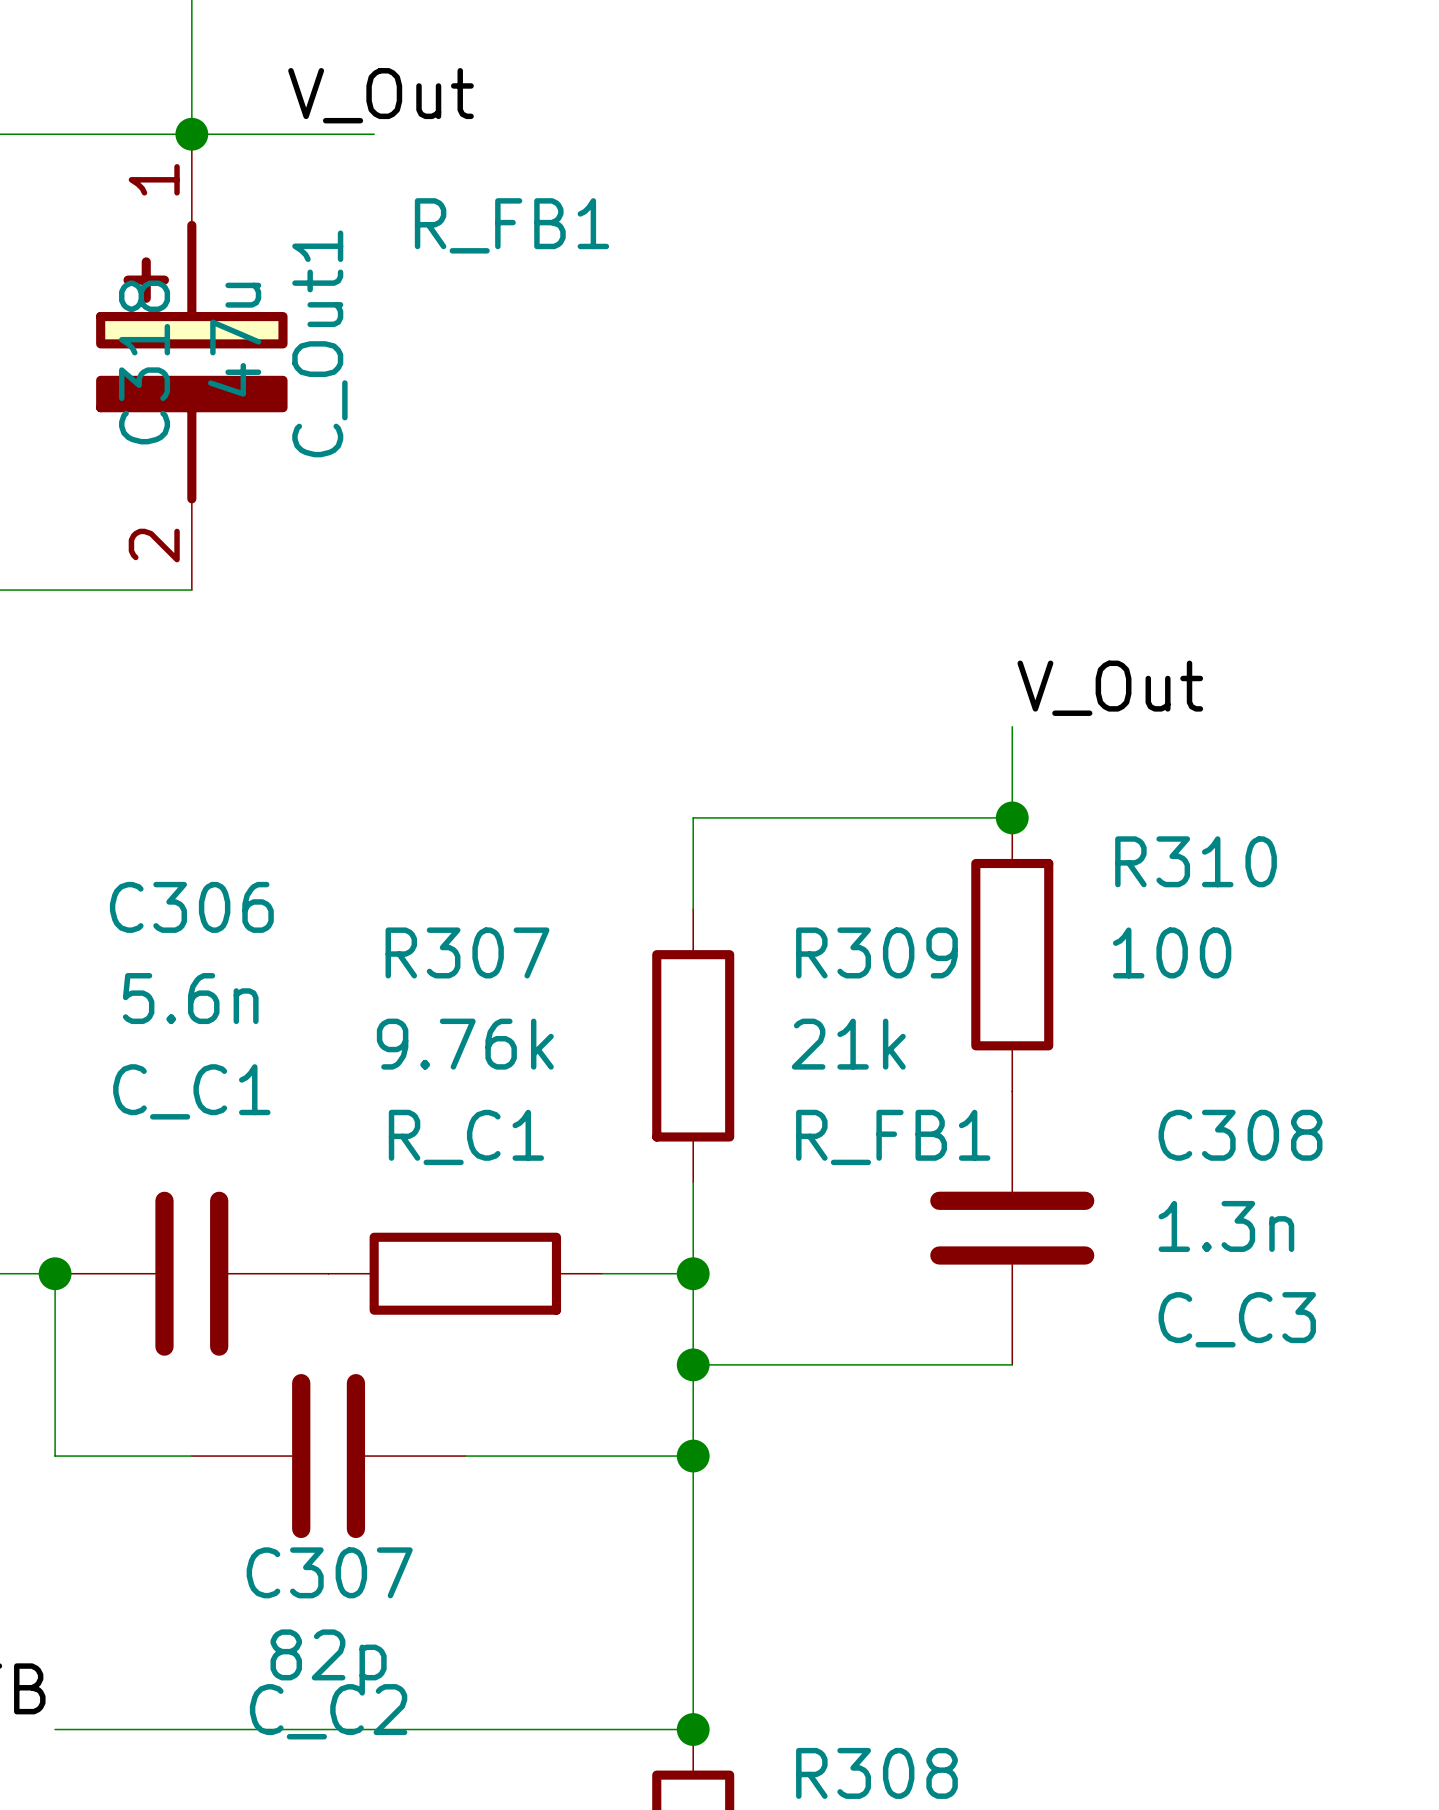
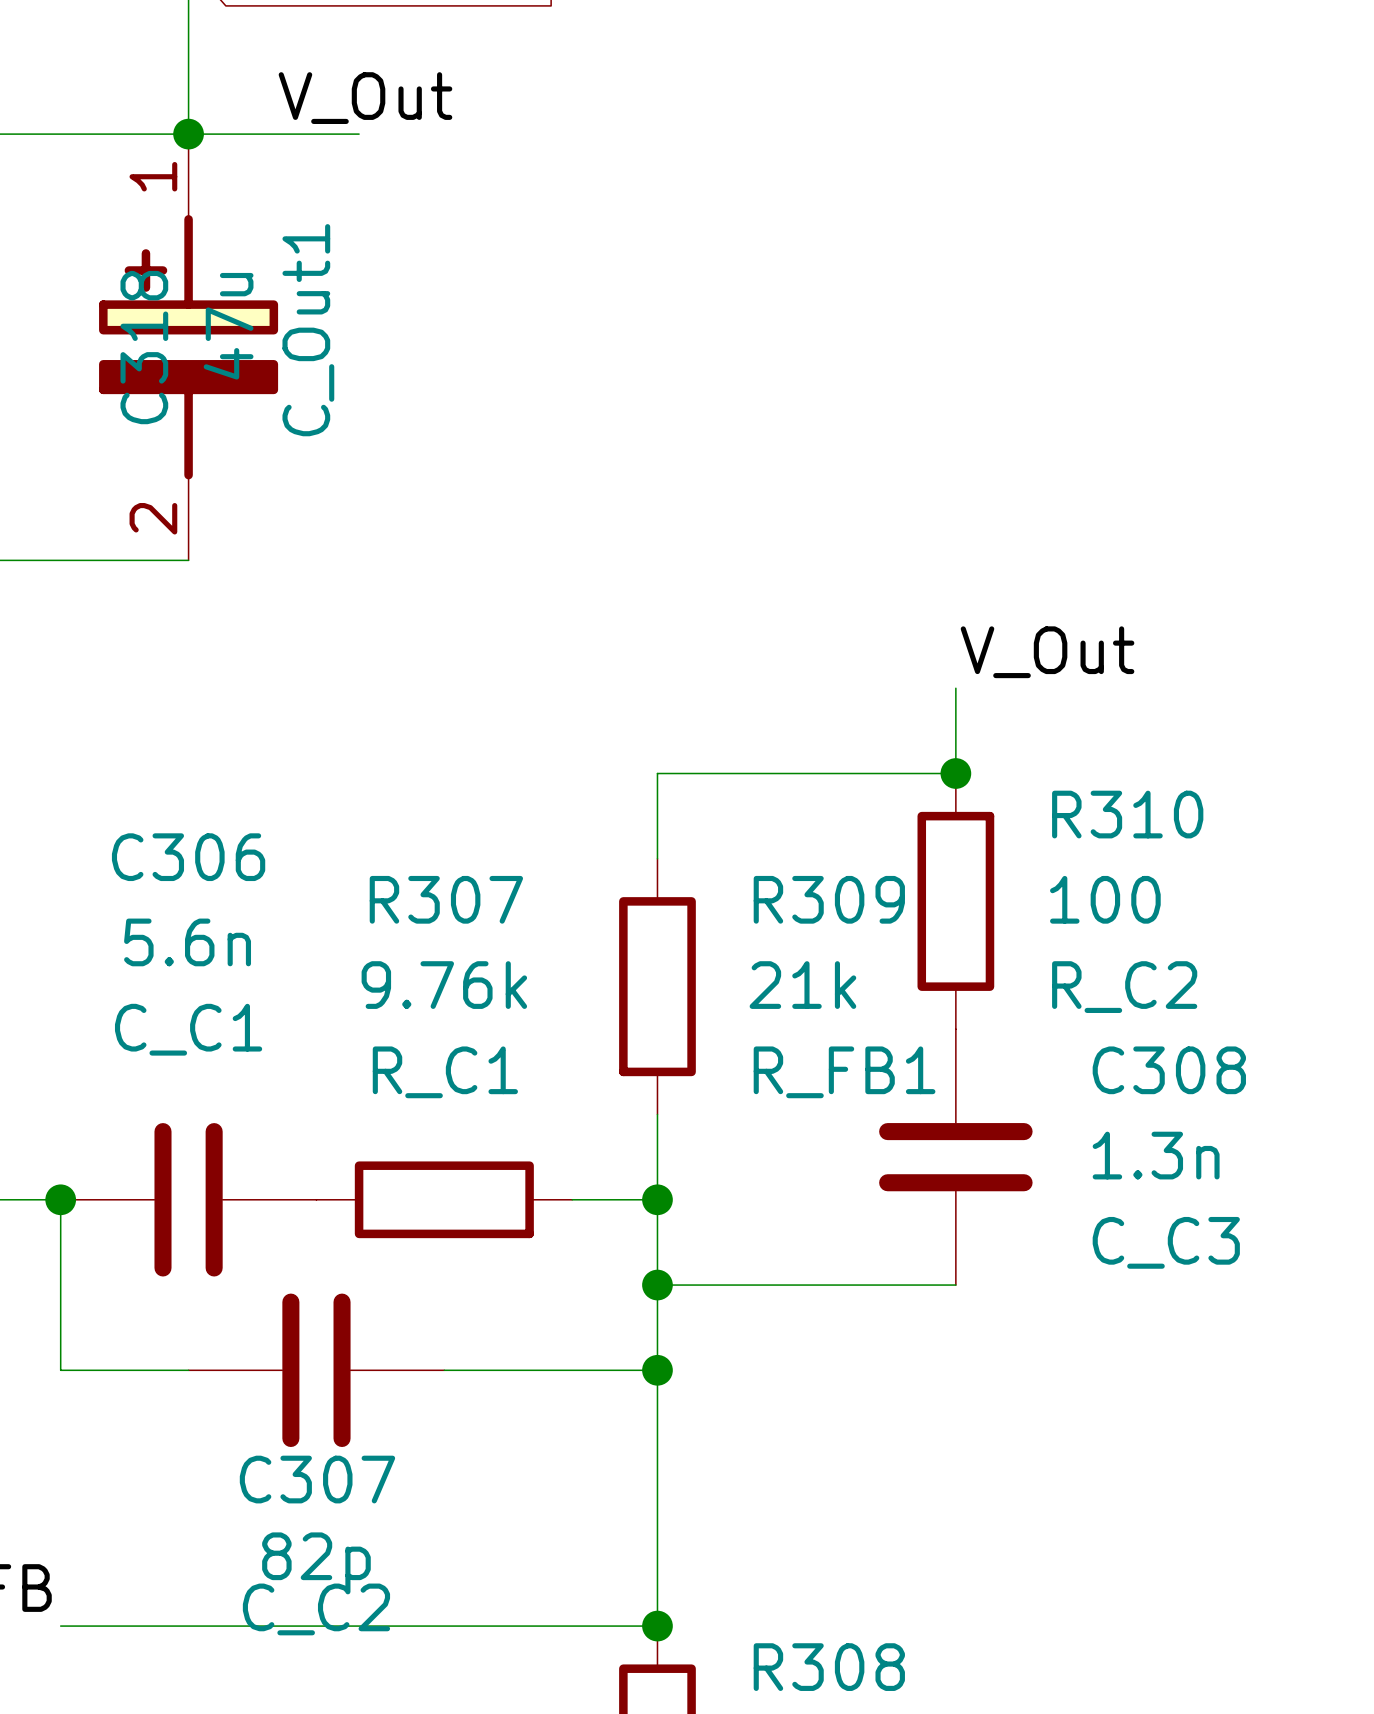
R310 text: R_FB1 (511, 225) -> R_C2 (1124, 987)

